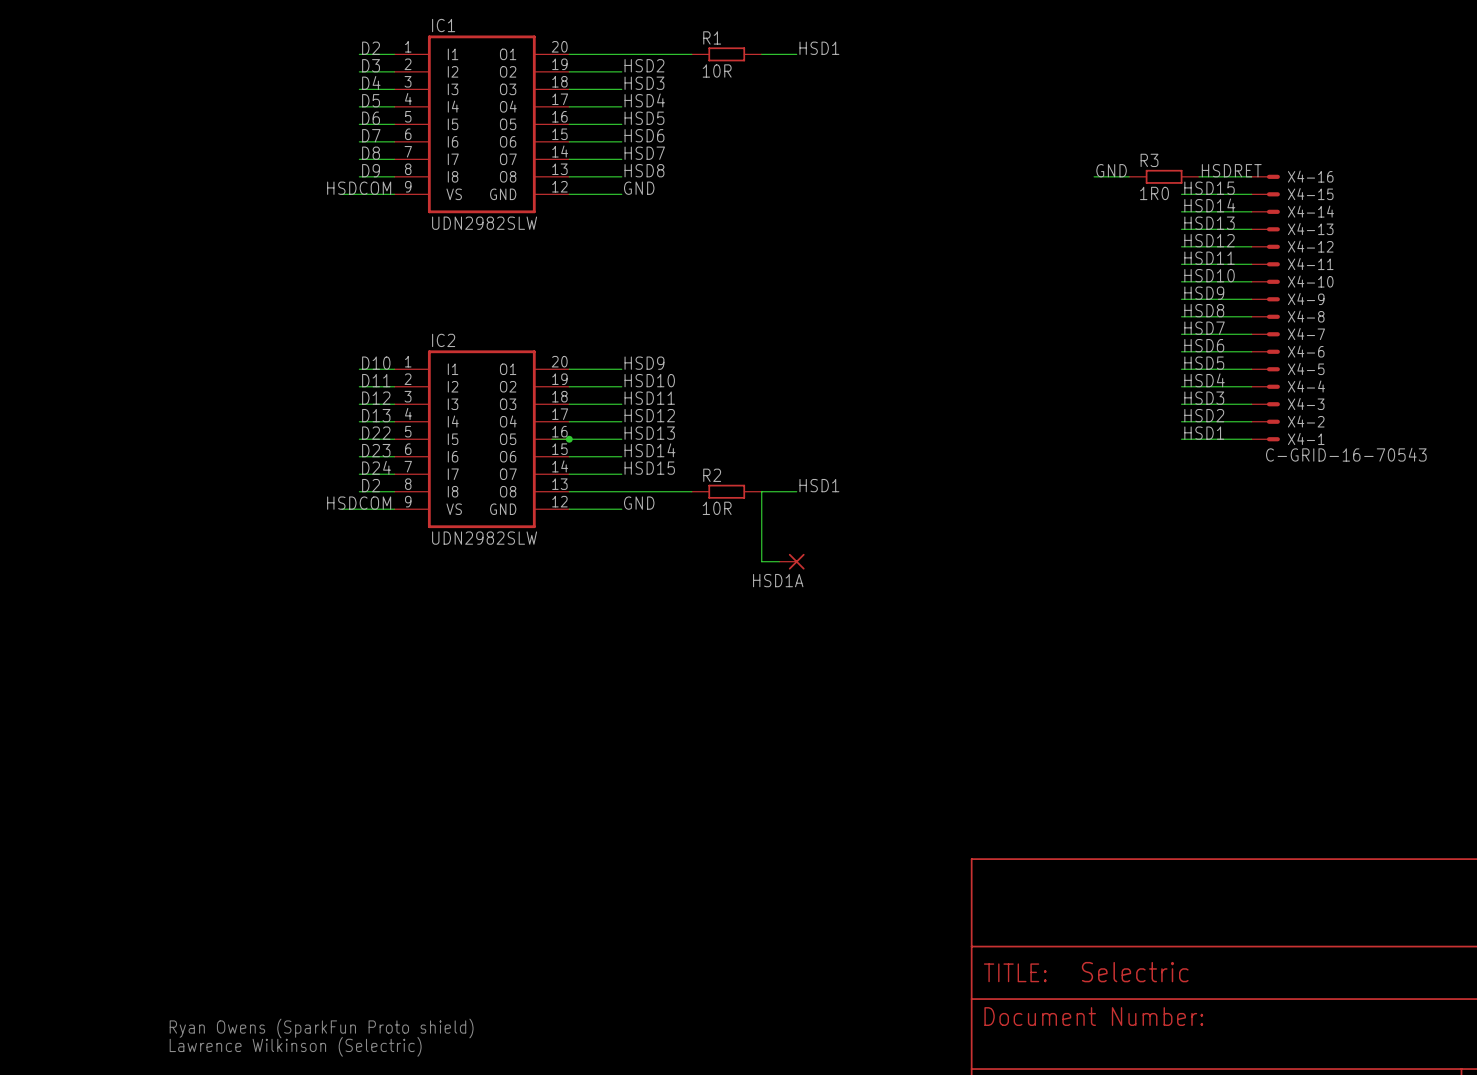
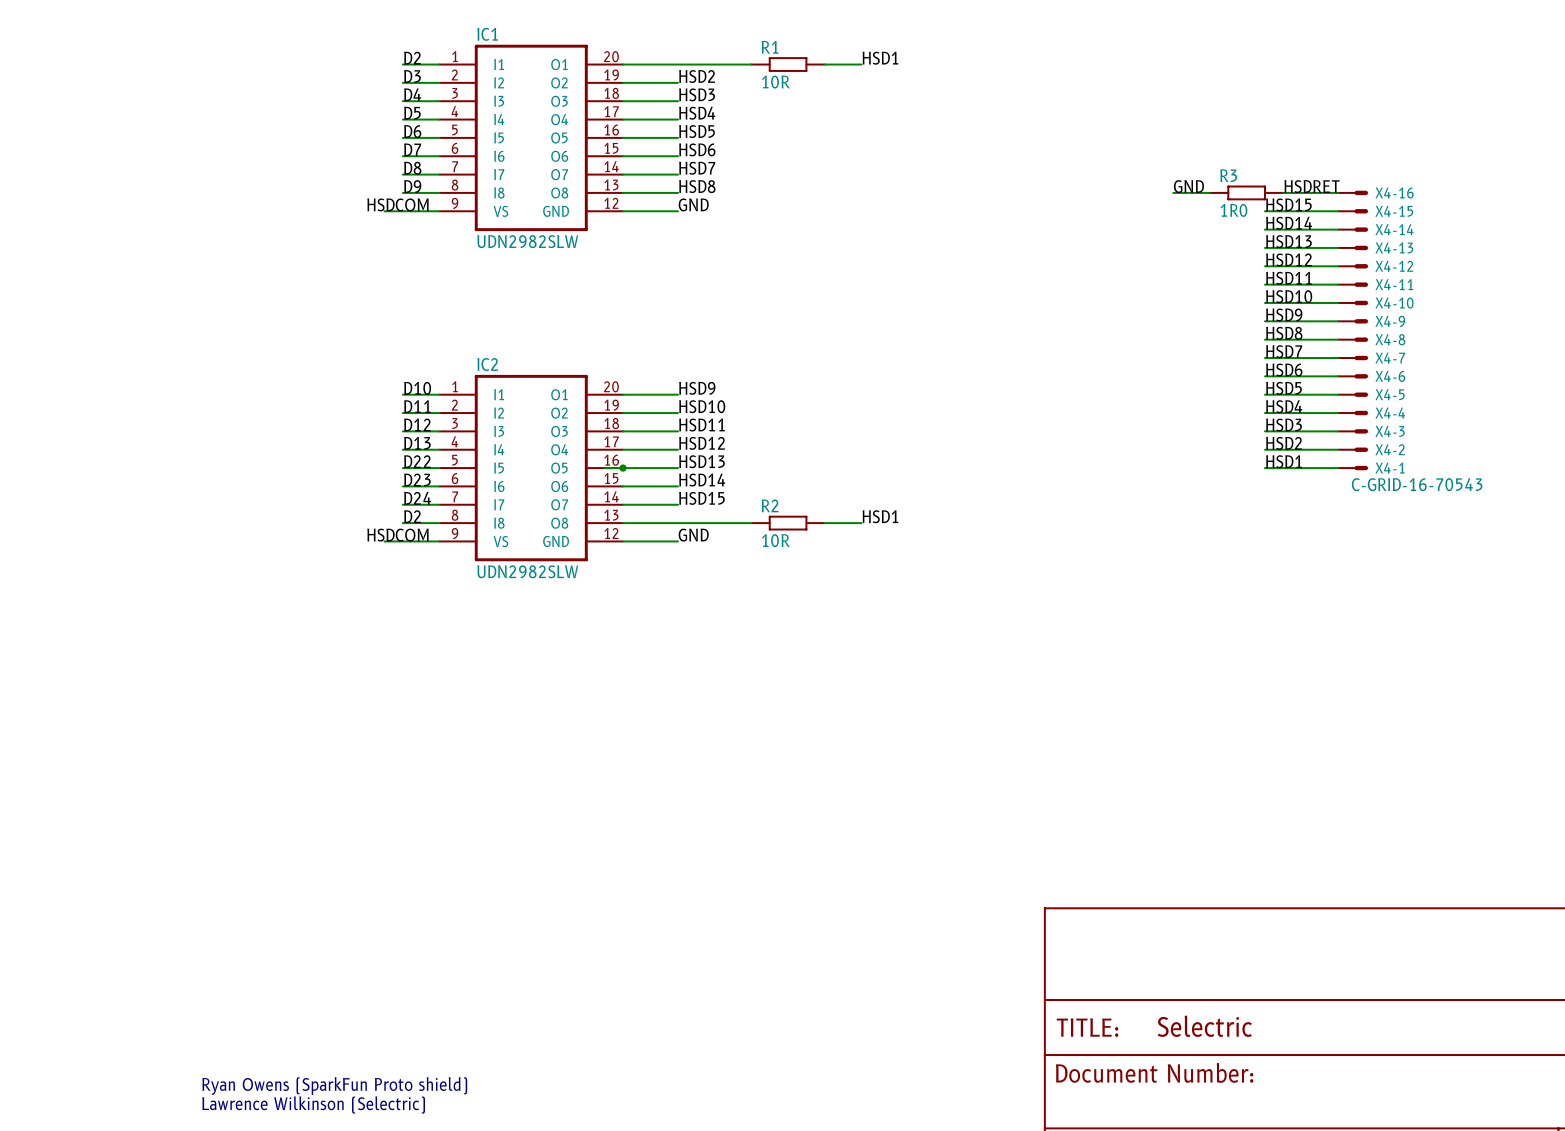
wire: (761, 491) (761, 561) (779, 561) -> none
HSD1A: (791, 561) -> none

